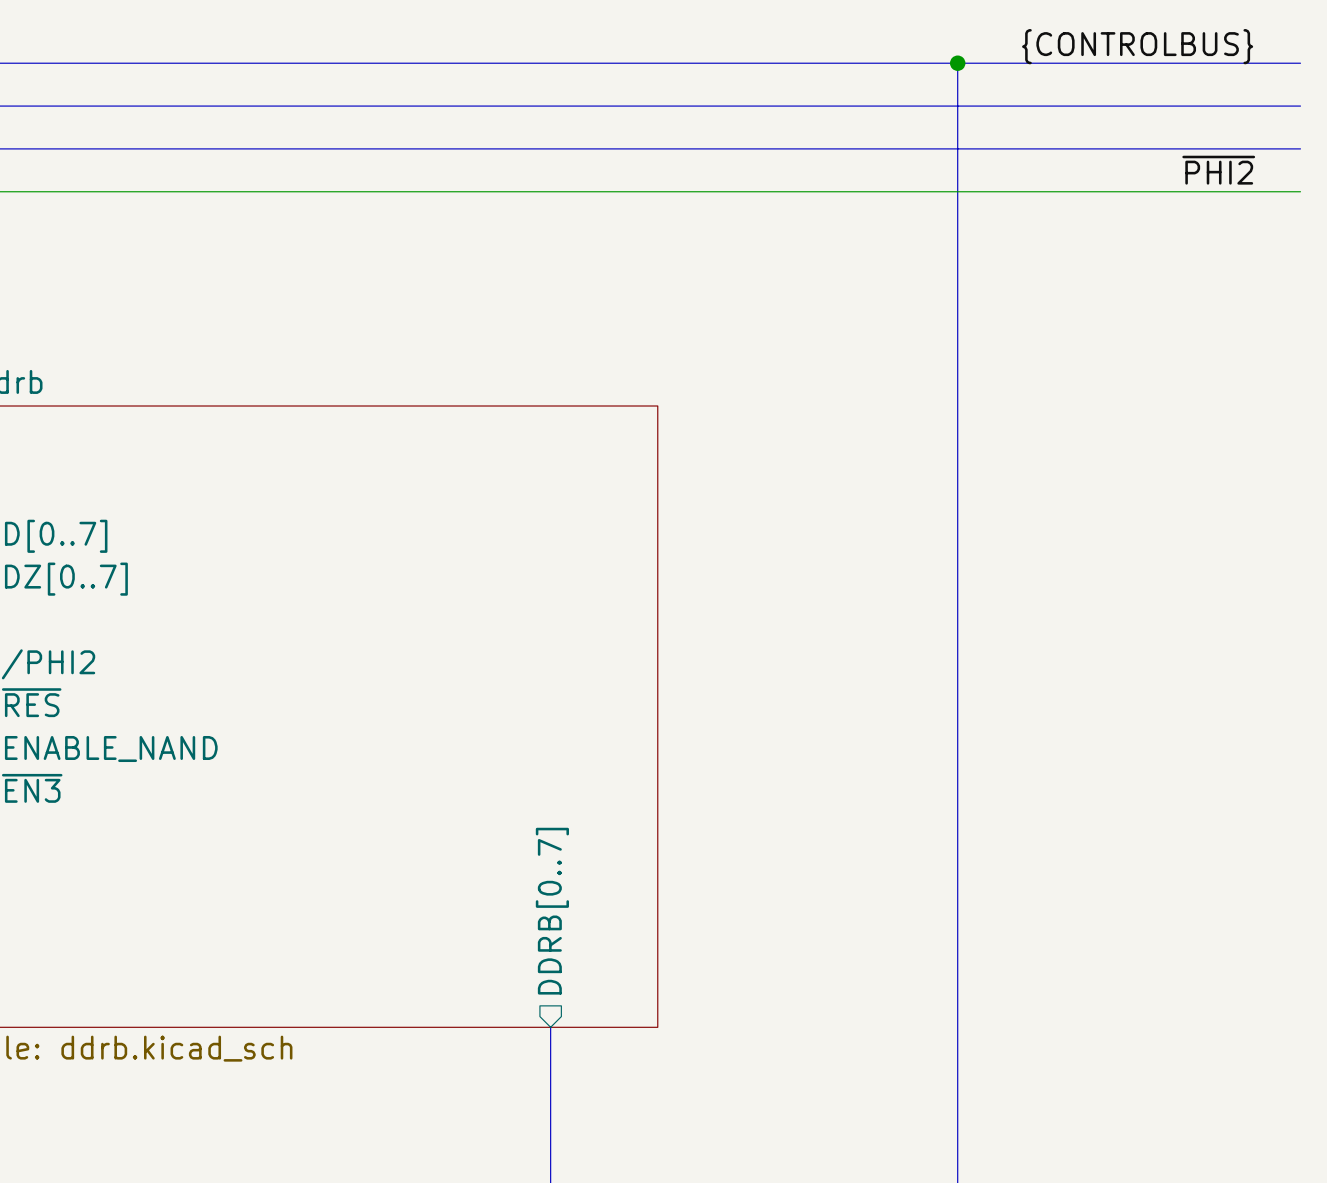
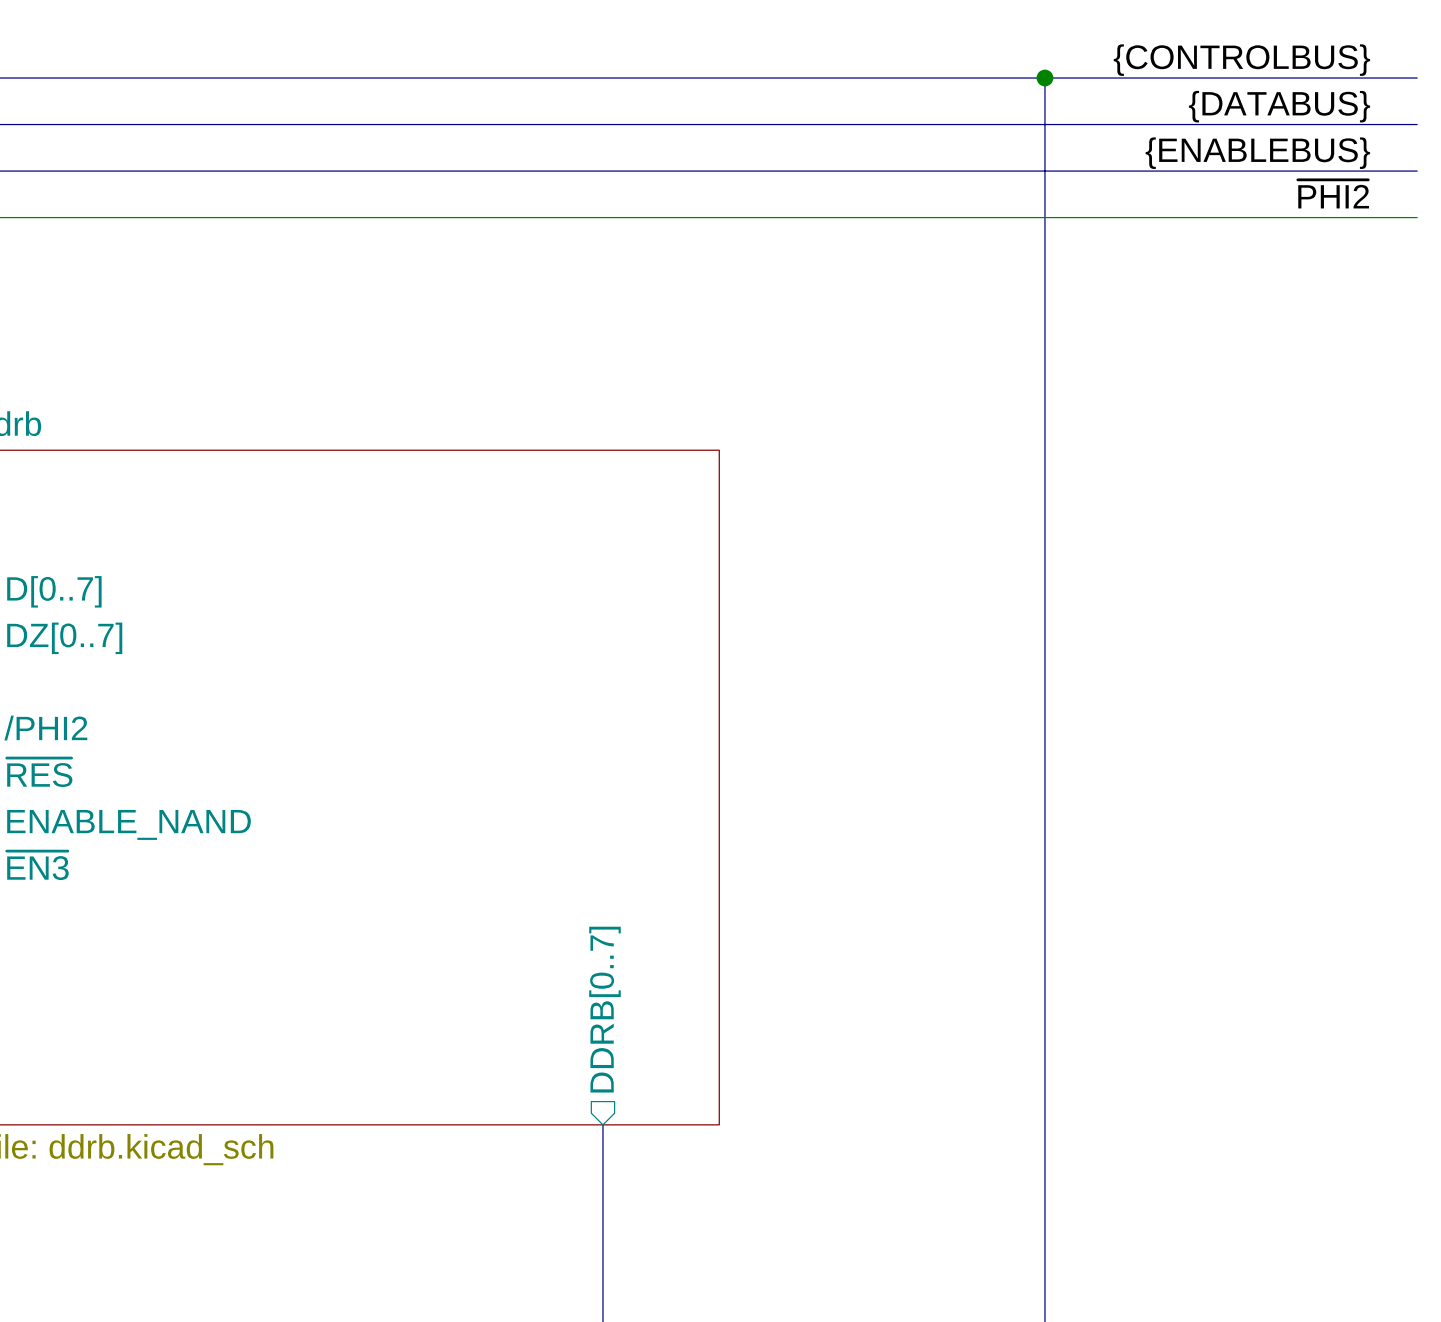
label: none -> {DATABUS} (1279, 106)
label: none -> {ENABLEBUS} (1257, 153)

